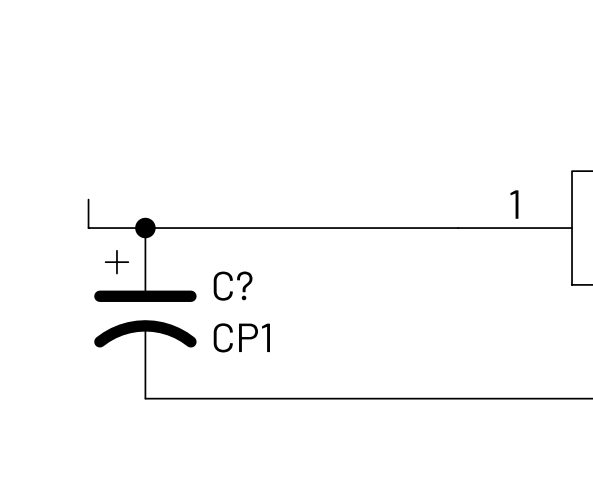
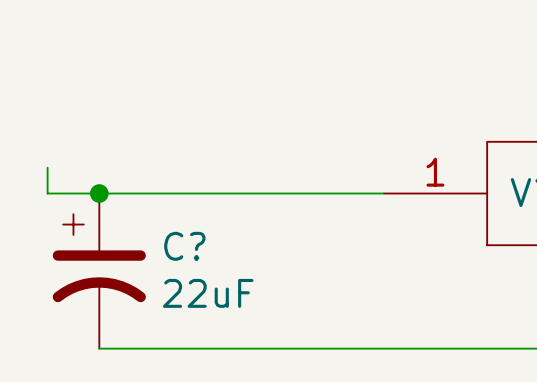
C? value: CP1 (241, 337) -> 22uF (208, 293)

